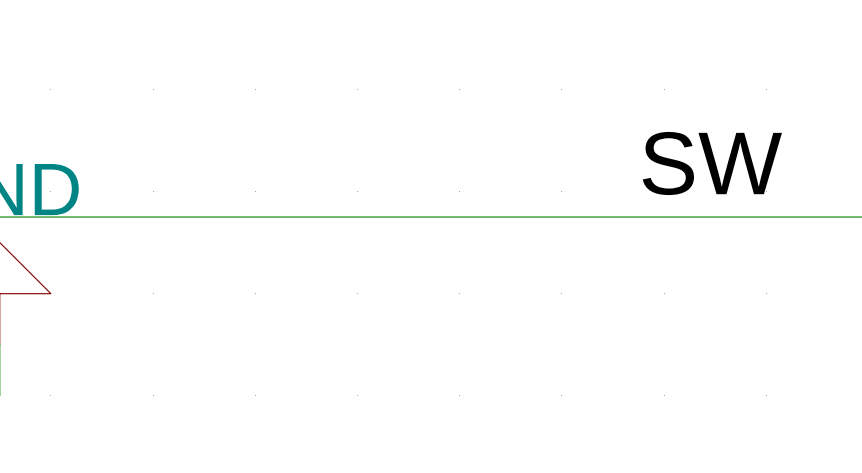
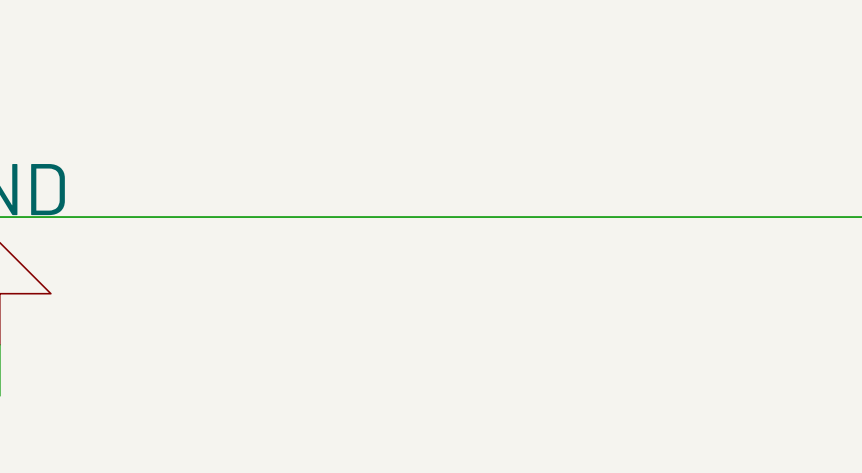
label: SW (712, 163) -> none

